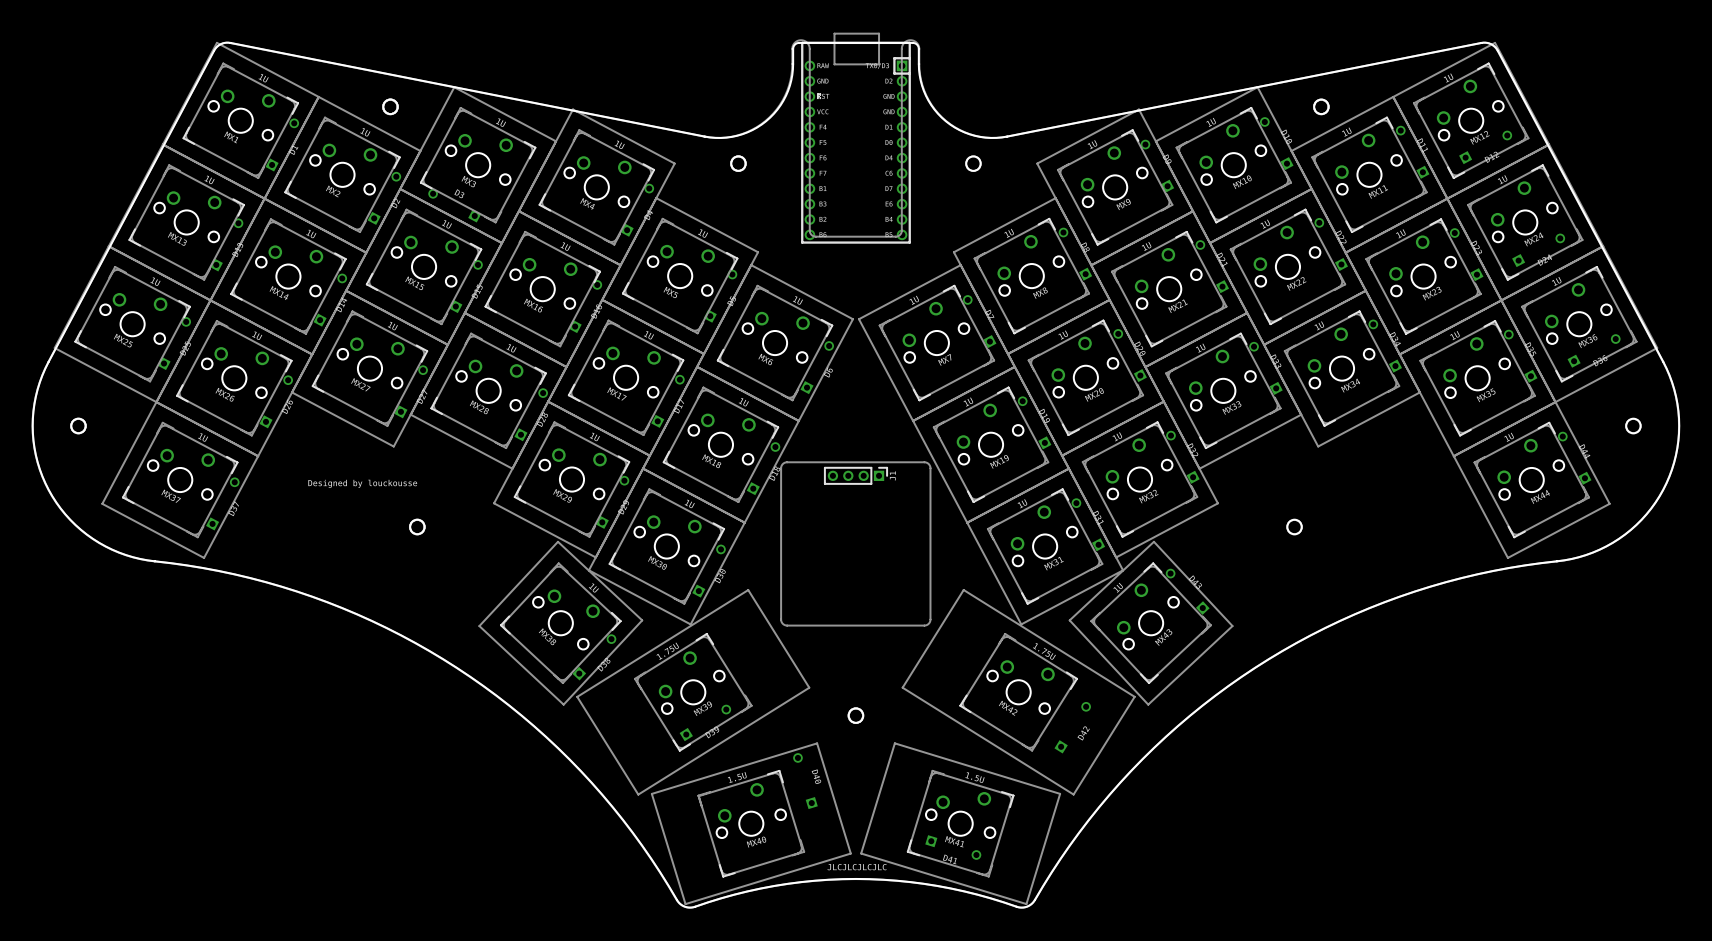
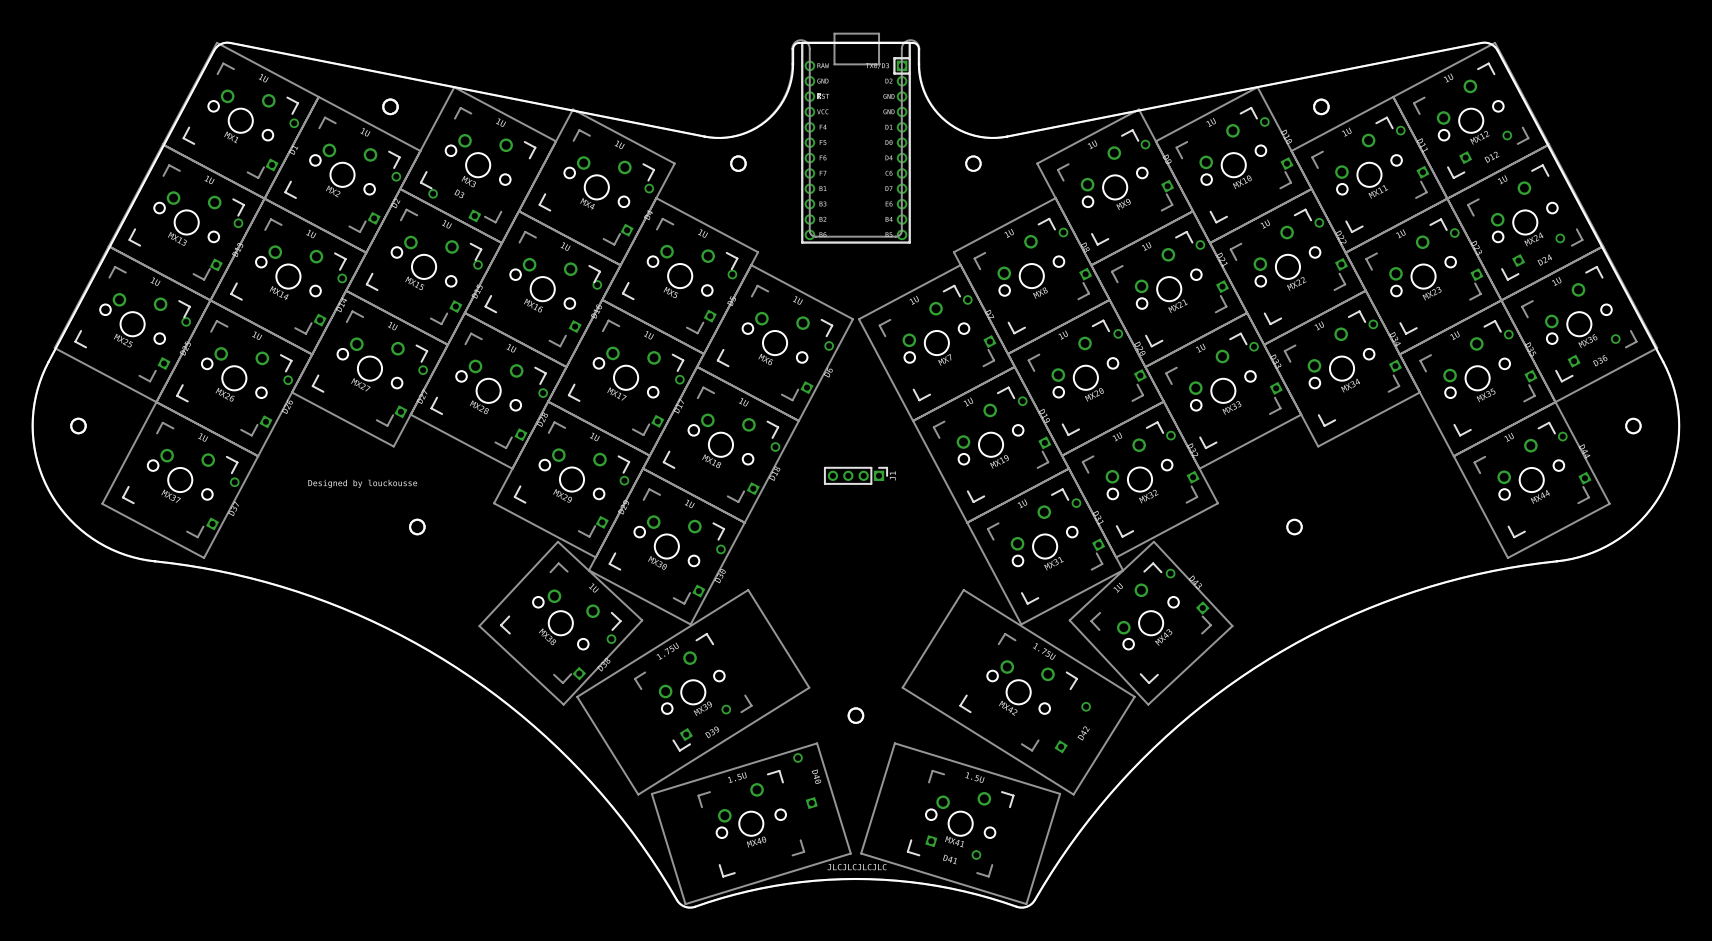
line: (1482, 67) (1419, 100) (1416, 104) (1417, 108) (1450, 172) (1454, 175) (1459, 174) (1522, 141) (1525, 137) (1524, 132) (1491, 69) (1487, 66) (1482, 67) -> none
line: (465, 111) (529, 145) (532, 148) (531, 153) (498, 216) (494, 219) (489, 219) (426, 185) (423, 181) (424, 177) (457, 114) (461, 111) (465, 111) -> none
line: (1245, 111) (1182, 145) (1179, 148) (1179, 153) (1213, 216) (1217, 219) (1221, 219) (1284, 185) (1287, 181) (1287, 177) (1253, 113) (1250, 111) (1245, 111) -> none
line: (330, 121) (393, 154) (396, 158) (396, 163) (362, 226) (358, 229) (354, 228) (291, 195) (288, 191) (288, 186) (322, 123) (325, 120) (330, 121) -> none
line: (1381, 121) (1383, 120) (1385, 120) (1389, 123) (1423, 186) (1423, 191) (1420, 195) (1357, 228) (1352, 229) (1349, 226) (1315, 162) (1315, 158) (1317, 154) (1381, 121) -> none
line: (1126, 133) (1063, 167) (1060, 170) (1061, 175) (1094, 238) (1098, 241) (1102, 241) (1166, 207) (1169, 204) (1168, 199) (1135, 136) (1131, 133) (1126, 133) -> none
line: (174, 168) (237, 202) (240, 206) (240, 210) (206, 273) (203, 276) (198, 276) (135, 242) (132, 239) (132, 234) (166, 171) (169, 168) (174, 168) -> none
line: (252, 174) (257, 175) (260, 172) (294, 108) (294, 104) (291, 100) (228, 67) (223, 66) (220, 69) (186, 132) (186, 137) (189, 141) (252, 174) -> none
line: (411, 213) (475, 246) (478, 250) (477, 255) (444, 318) (440, 321) (435, 320) (372, 287) (369, 283) (370, 279) (403, 215) (407, 212) (411, 213) -> none
line: (276, 222) (339, 256) (342, 260) (342, 264) (308, 328) (304, 330) (300, 330) (236, 296) (233, 293) (234, 288) (268, 225) (271, 222) (276, 222) -> none
line: (1043, 222) (980, 256) (977, 259) (977, 264) (1011, 327) (1015, 330) (1019, 329) (1082, 296) (1085, 292) (1085, 288) (1051, 224) (1048, 221) (1043, 222) -> none
line: (530, 235) (593, 269) (596, 272) (596, 277) (562, 340) (559, 343) (554, 343) (491, 309) (488, 305) (488, 301) (522, 237) (525, 234) (530, 235) -> none
line: (608, 241) (545, 207) (542, 204) (542, 199) (576, 136) (580, 133) (584, 133) (647, 167) (650, 170) (650, 175) (616, 238) (613, 241) (608, 241) -> none
line: (1372, 256) (1435, 222) (1439, 222) (1443, 225) (1477, 288) (1477, 293) (1474, 296) (1411, 330) (1406, 330) (1403, 327) (1369, 264) (1369, 260) (1372, 256) -> none
line: (120, 270) (183, 304) (186, 307) (186, 312) (152, 375) (148, 378) (144, 378) (81, 344) (78, 340) (78, 336) (112, 273) (115, 270) (120, 270) -> none
line: (1591, 270) (1527, 304) (1524, 307) (1525, 312) (1559, 375) (1562, 378) (1567, 378) (1630, 344) (1633, 340) (1632, 336) (1599, 273) (1595, 270) (1593, 269) (1591, 270) -> none
line: (1504, 273) (1471, 210) (1470, 206) (1473, 202) (1537, 168) (1541, 168) (1545, 171) (1578, 234) (1579, 239) (1576, 242) (1513, 276) (1508, 276) (1504, 273) -> none
line: (762, 289) (826, 323) (829, 326) (828, 331) (795, 394) (791, 397) (786, 396) (723, 363) (720, 359) (721, 355) (754, 291) (758, 288) (760, 288) (762, 289) -> none
line: (948, 289) (885, 323) (882, 326) (882, 331) (916, 394) (920, 397) (924, 396) (988, 363) (990, 359) (990, 355) (956, 291) (953, 288) (948, 289) -> none
line: (357, 314) (421, 348) (424, 352) (423, 356) (389, 420) (386, 423) (381, 422) (318, 388) (315, 385) (315, 380) (349, 317) (353, 314) (357, 314) -> none
line: (1353, 314) (1290, 348) (1287, 352) (1287, 356) (1321, 420) (1325, 422) (1329, 422) (1393, 388) (1396, 385) (1395, 380) (1361, 317) (1358, 314) (1356, 314) (1353, 314) -> none
line: (1267, 318) (1233, 255) (1233, 250) (1236, 246) (1299, 213) (1304, 212) (1307, 215) (1341, 278) (1341, 283) (1339, 287) (1275, 320) (1271, 321) (1267, 318) -> none
line: (222, 324) (285, 358) (288, 361) (287, 366) (254, 429) (250, 432) (246, 432) (182, 398) (179, 395) (180, 390) (213, 327) (217, 324) (222, 324) -> none
line: (613, 324) (677, 357) (680, 361) (679, 365) (646, 429) (642, 432) (637, 431) (574, 398) (571, 394) (572, 389) (605, 326) (609, 323) (613, 324) -> none
line: (1489, 324) (1426, 358) (1423, 361) (1423, 366) (1457, 429) (1460, 432) (1465, 432) (1528, 398) (1531, 395) (1531, 390) (1497, 327) (1494, 324) (1491, 323) (1489, 324) -> none
line: (691, 329) (628, 296) (625, 292) (626, 288) (659, 224) (663, 221) (667, 222) (731, 256) (734, 259) (733, 264) (700, 327) (696, 330) (691, 329) -> none
line: (476, 337) (539, 370) (542, 374) (542, 378) (508, 442) (505, 445) (500, 444) (437, 411) (434, 407) (434, 402) (468, 339) (471, 336) (476, 337) -> none
line: (1235, 337) (1171, 370) (1168, 374) (1169, 378) (1202, 442) (1206, 445) (1211, 444) (1274, 411) (1277, 407) (1276, 402) (1243, 339) (1239, 336) (1237, 336) (1235, 337) -> none
line: (1148, 340) (1115, 277) (1114, 272) (1117, 269) (1181, 235) (1185, 234) (1189, 237) (1222, 301) (1223, 305) (1220, 309) (1157, 343) (1152, 343) (1148, 340) -> none
line: (708, 391) (772, 424) (775, 428) (774, 432) (740, 496) (737, 499) (732, 498) (669, 465) (666, 461) (666, 456) (700, 393) (704, 390) (708, 391) -> none
line: (1151, 425) (1088, 459) (1085, 463) (1085, 467) (1119, 530) (1123, 533) (1127, 533) (1191, 499) (1194, 496) (1193, 491) (1159, 428) (1156, 425) (1154, 425) (1151, 425) -> none
line: (168, 426) (231, 460) (234, 463) (233, 468) (200, 531) (196, 534) (192, 534) (128, 500) (125, 496) (126, 492) (159, 428) (163, 425) (168, 426) -> none
line: (1543, 426) (1480, 459) (1477, 463) (1477, 468) (1511, 531) (1514, 534) (1519, 533) (1582, 500) (1585, 496) (1585, 492) (1551, 428) (1548, 425) (1543, 426) -> none
line: (551, 428) (517, 491) (517, 496) (520, 499) (583, 533) (588, 533) (591, 530) (625, 467) (626, 463) (623, 459) (559, 425) (555, 425) (551, 428) -> none
line: (1065, 429) (1031, 365) (1031, 361) (1034, 357) (1097, 324) (1102, 323) (1105, 326) (1139, 389) (1139, 394) (1137, 398) (1073, 431) (1069, 432) (1065, 429) -> none
line: (787, 462) (924, 462) (929, 464) (930, 619) (928, 624) (787, 625) (782, 623) (781, 468) (782, 464) (787, 462) -> none
line: (1056, 492) (993, 526) (990, 530) (991, 534) (1024, 597) (1028, 600) (1032, 600) (1096, 566) (1099, 563) (1098, 558) (1065, 495) (1061, 492) (1059, 492) (1056, 492) -> none
line: (970, 496) (937, 432) (936, 428) (939, 424) (1002, 391) (1007, 390) (1010, 393) (1044, 456) (1045, 461) (1042, 465) (978, 498) (974, 499) (970, 496) -> none
line: (615, 566) (678, 600) (683, 600) (686, 597) (720, 534) (720, 530) (717, 526) (654, 492) (650, 492) (646, 495) (612, 558) (612, 563) (615, 566) -> none
line: (562, 568) (558, 566) (554, 568) (505, 621) (503, 625) (505, 629) (558, 678) (562, 680) (566, 678) (615, 625) (617, 621) (615, 617) (562, 568) -> none
line: (1157, 568) (1205, 620) (1207, 625) (1205, 629) (1153, 678) (1148, 680) (1144, 678) (1095, 625) (1094, 621) (1096, 617) (1148, 568) (1152, 566) (1157, 568) -> none
line: (1010, 637) (1070, 675) (1073, 679) (1072, 684) (1034, 744) (1031, 747) (1026, 746) (965, 708) (963, 705) (963, 700) (1001, 639) (1005, 637) (1010, 637) -> none
line: (701, 638) (640, 676) (637, 679) (638, 684) (676, 745) (680, 747) (684, 747) (745, 709) (748, 705) (747, 700) (709, 639) (705, 637) (701, 638) -> none
line: (938, 773) (1006, 794) (1010, 797) (1010, 801) (989, 870) (987, 873) (982, 874) (913, 853) (910, 850) (909, 845) (930, 777) (933, 773) (936, 773) (938, 773) -> none
line: (780, 777) (773, 773) (698, 796) (721, 870) (724, 874) (729, 874) (797, 853) -> none
line: (780, 777) (801, 846) (797, 853) -> none

